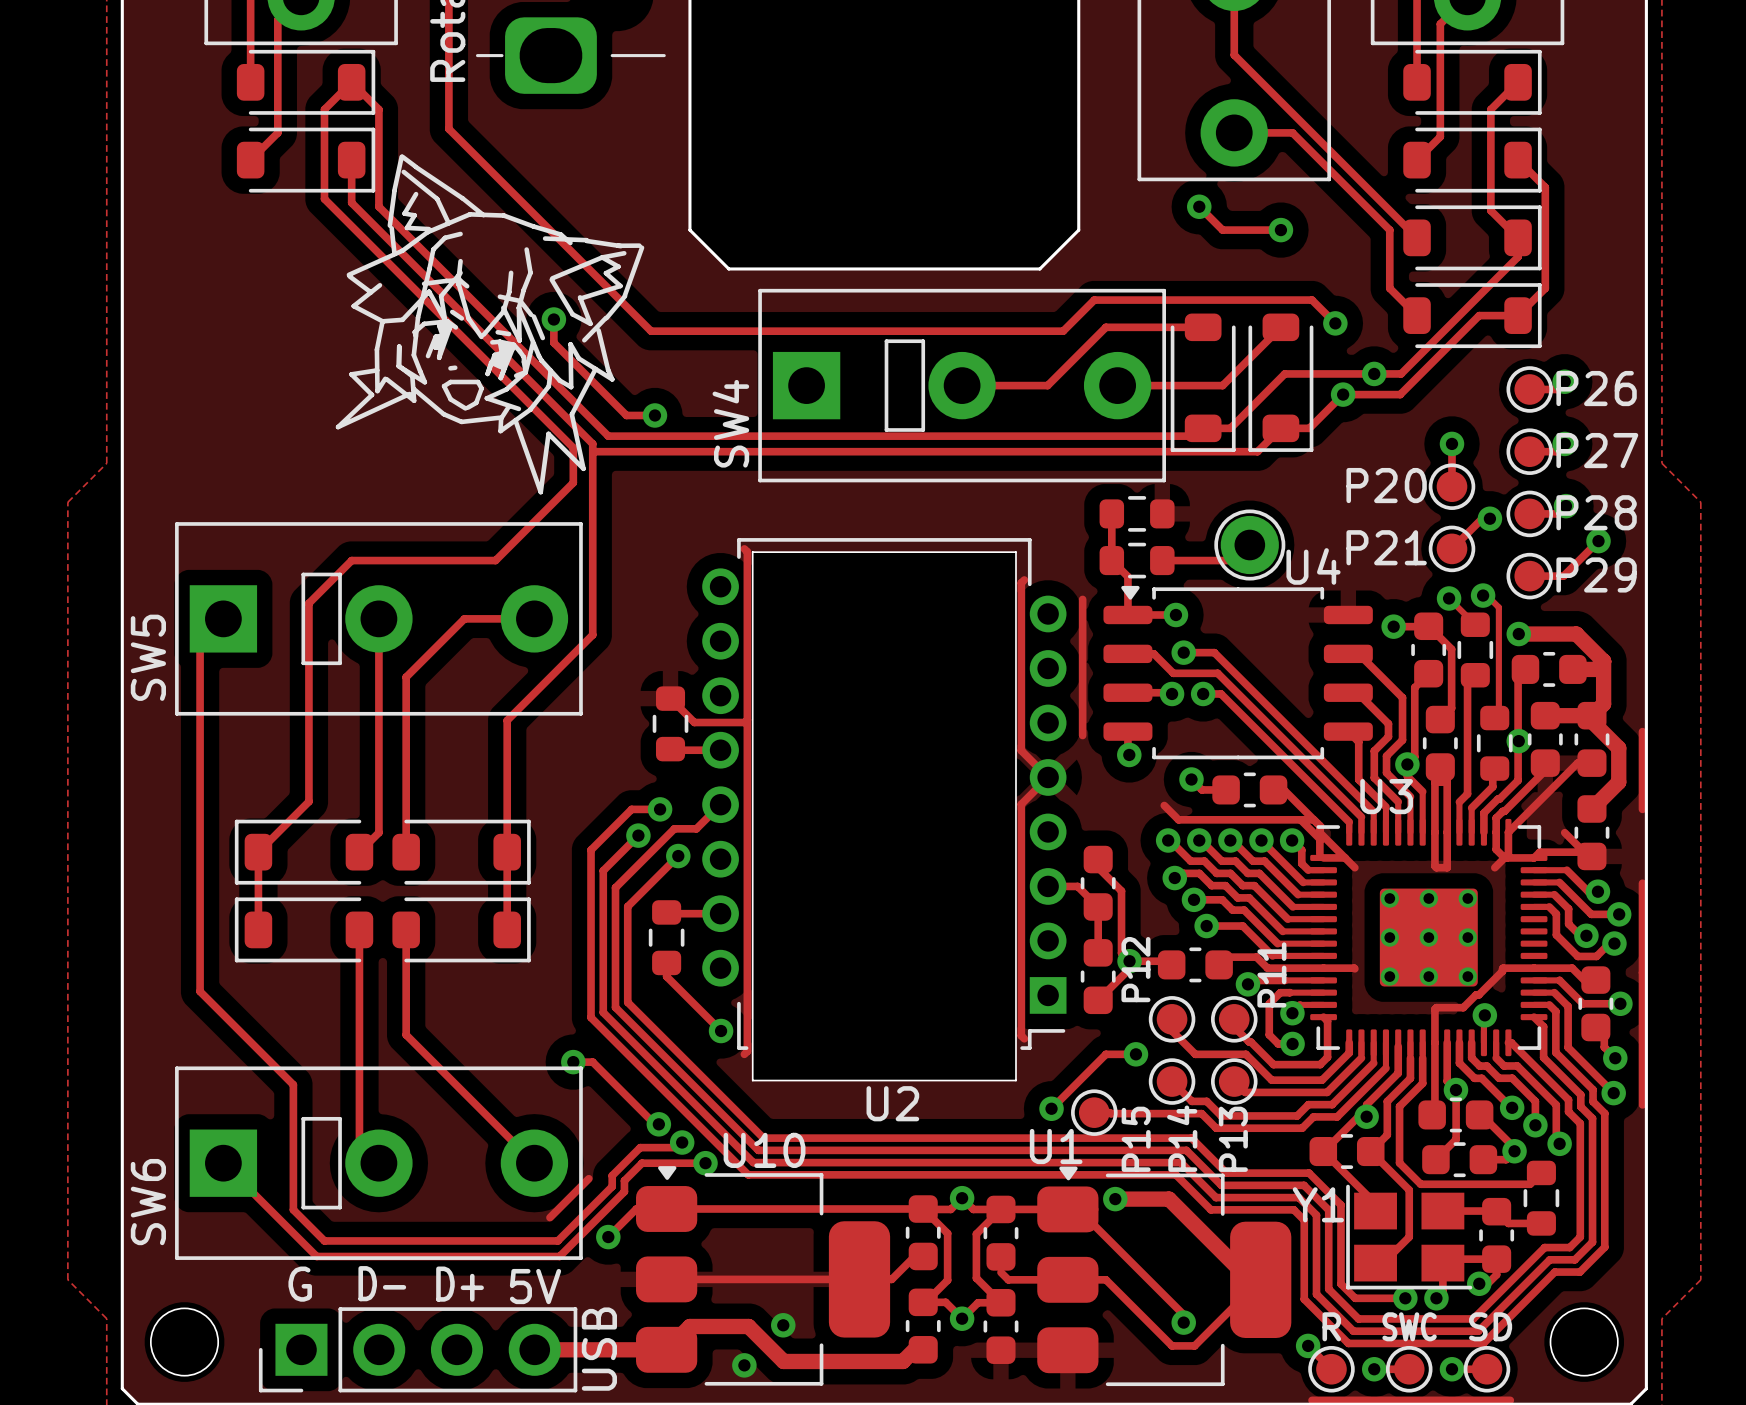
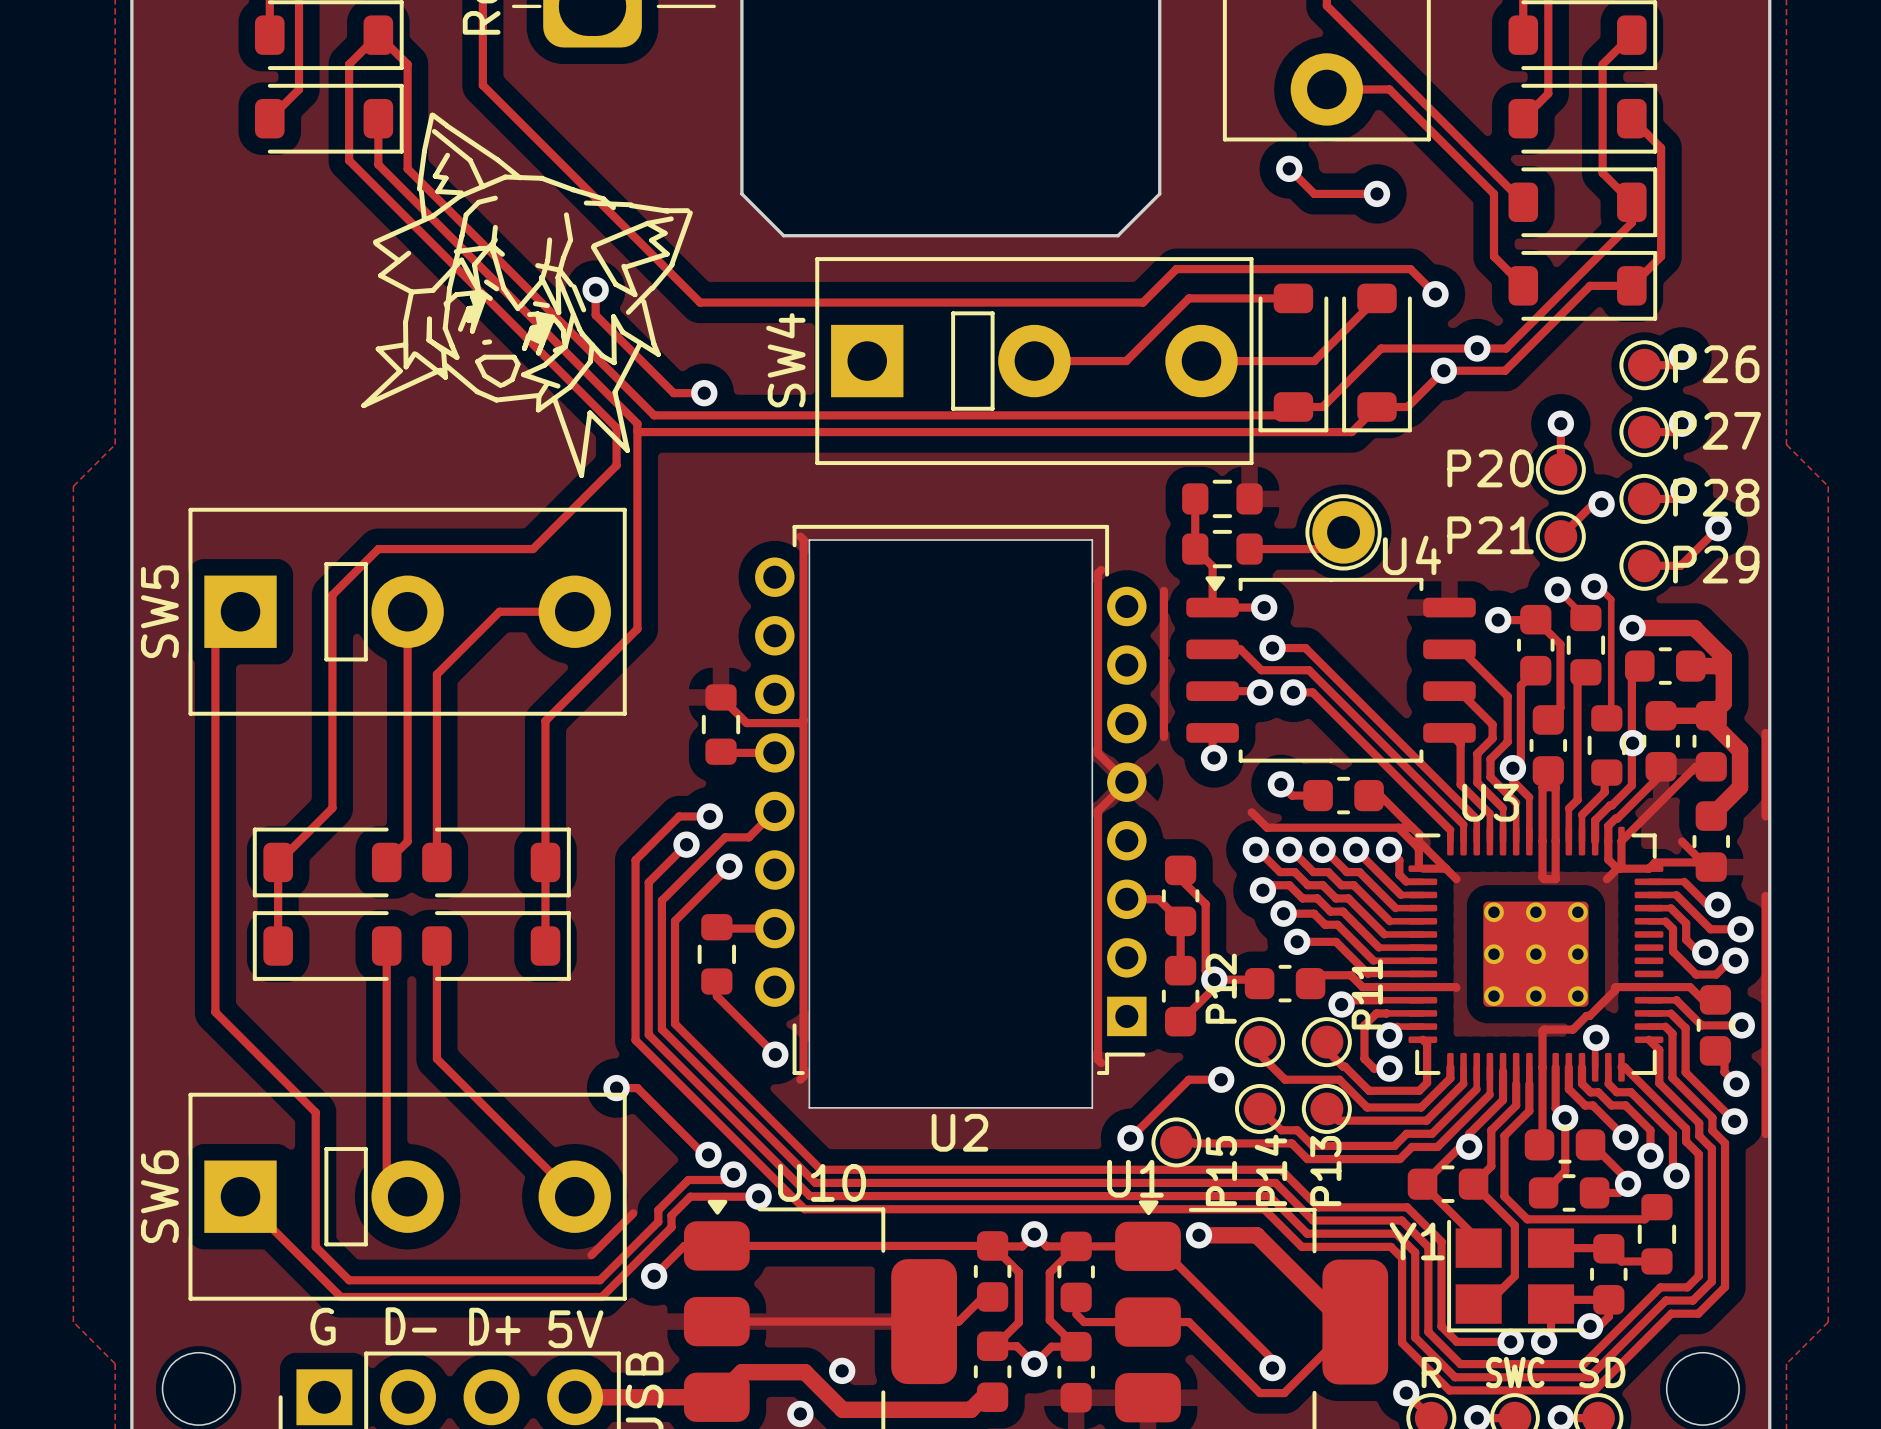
SW4 name position: SW4 (730, 423) -> SW4 (785, 360)
SW5 name position: SW5 (148, 657) -> SW5 (159, 611)
SW6 name position: SW6 (148, 1202) -> SW6 (159, 1196)

